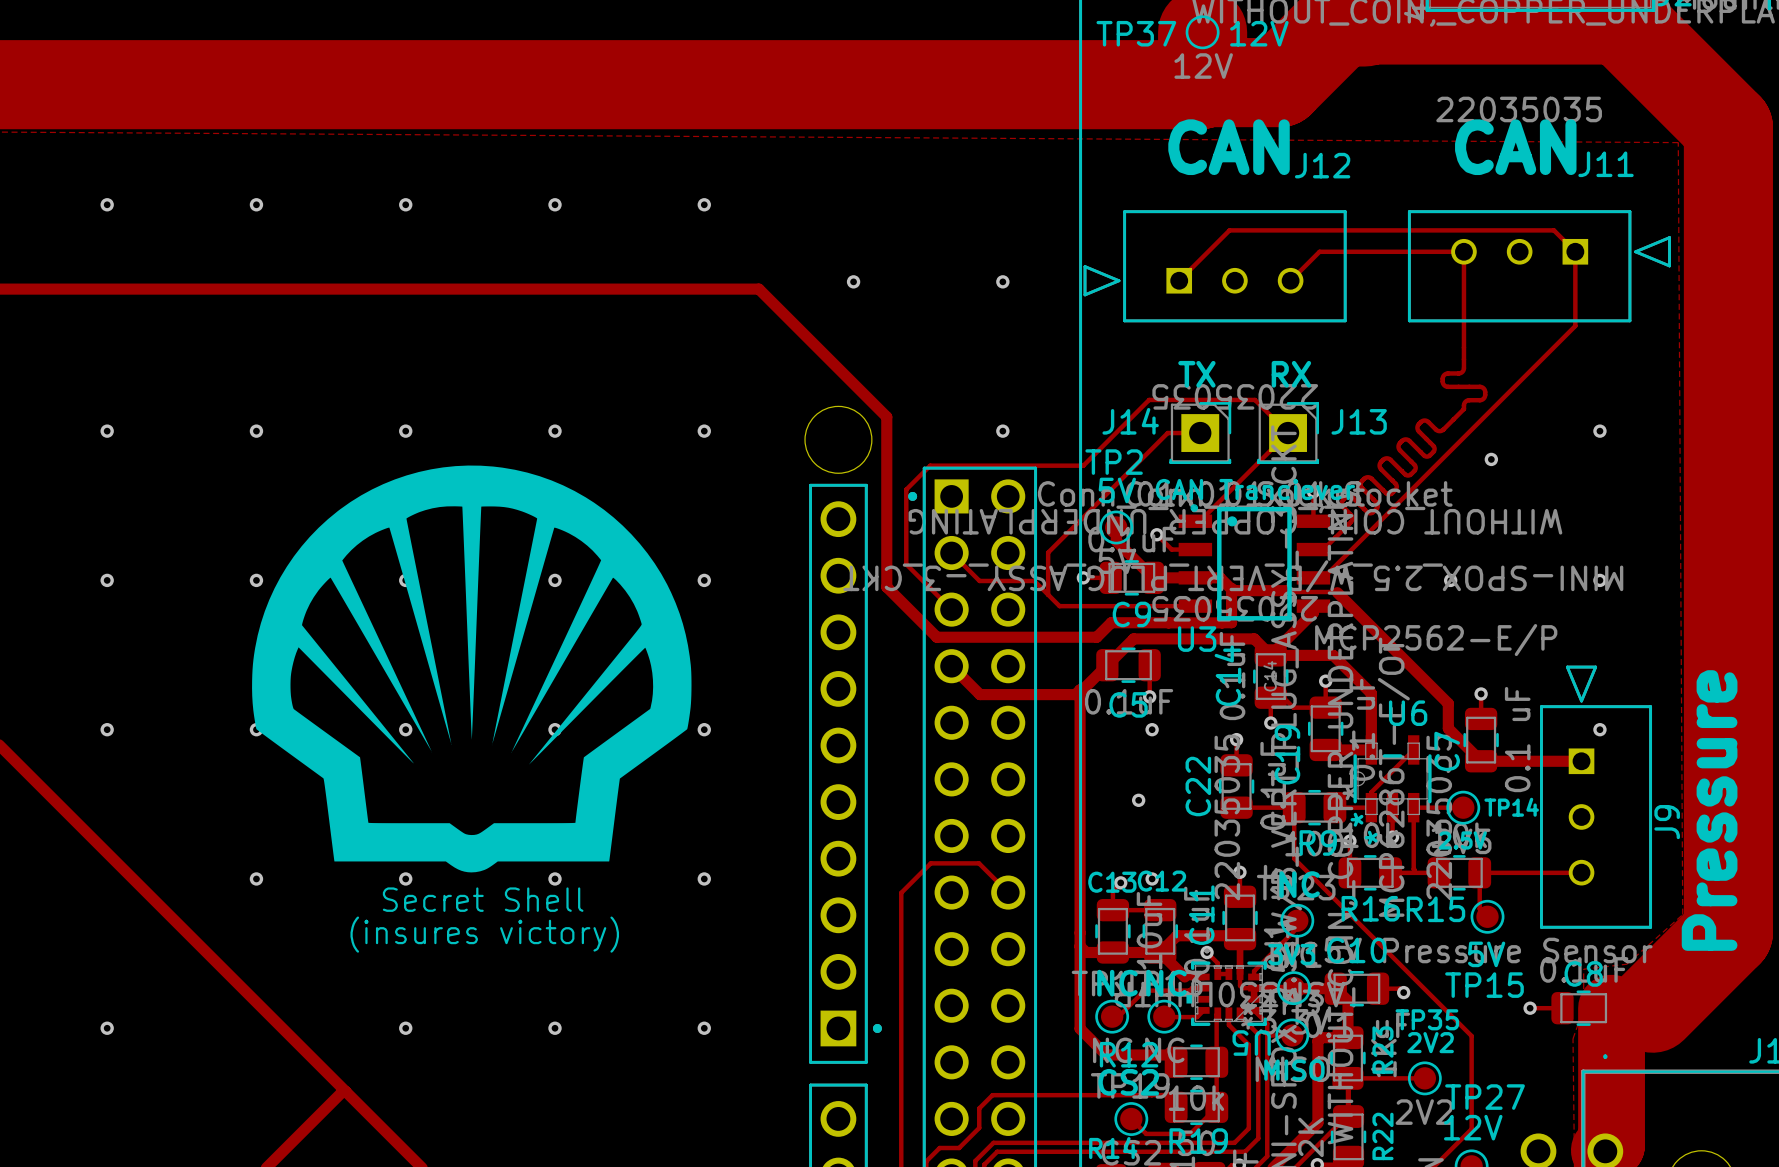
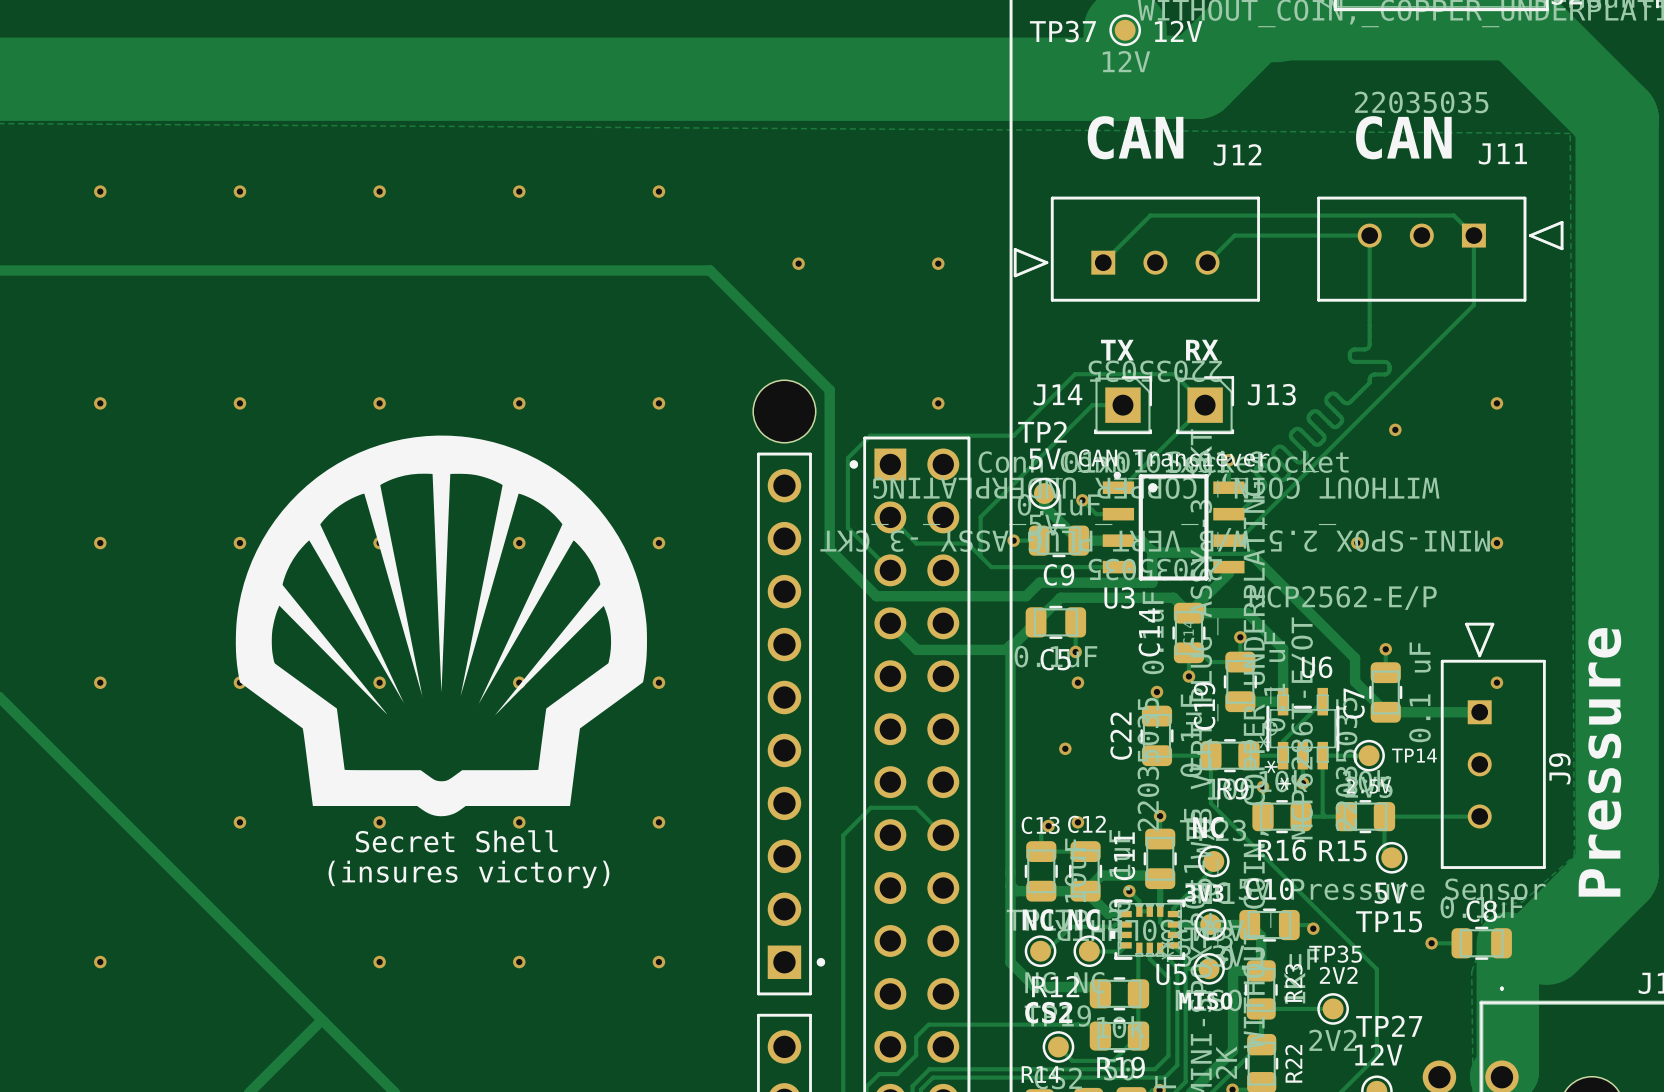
U5 name rotation: 0° (1251, 1043) -> 180° (1171, 974)

